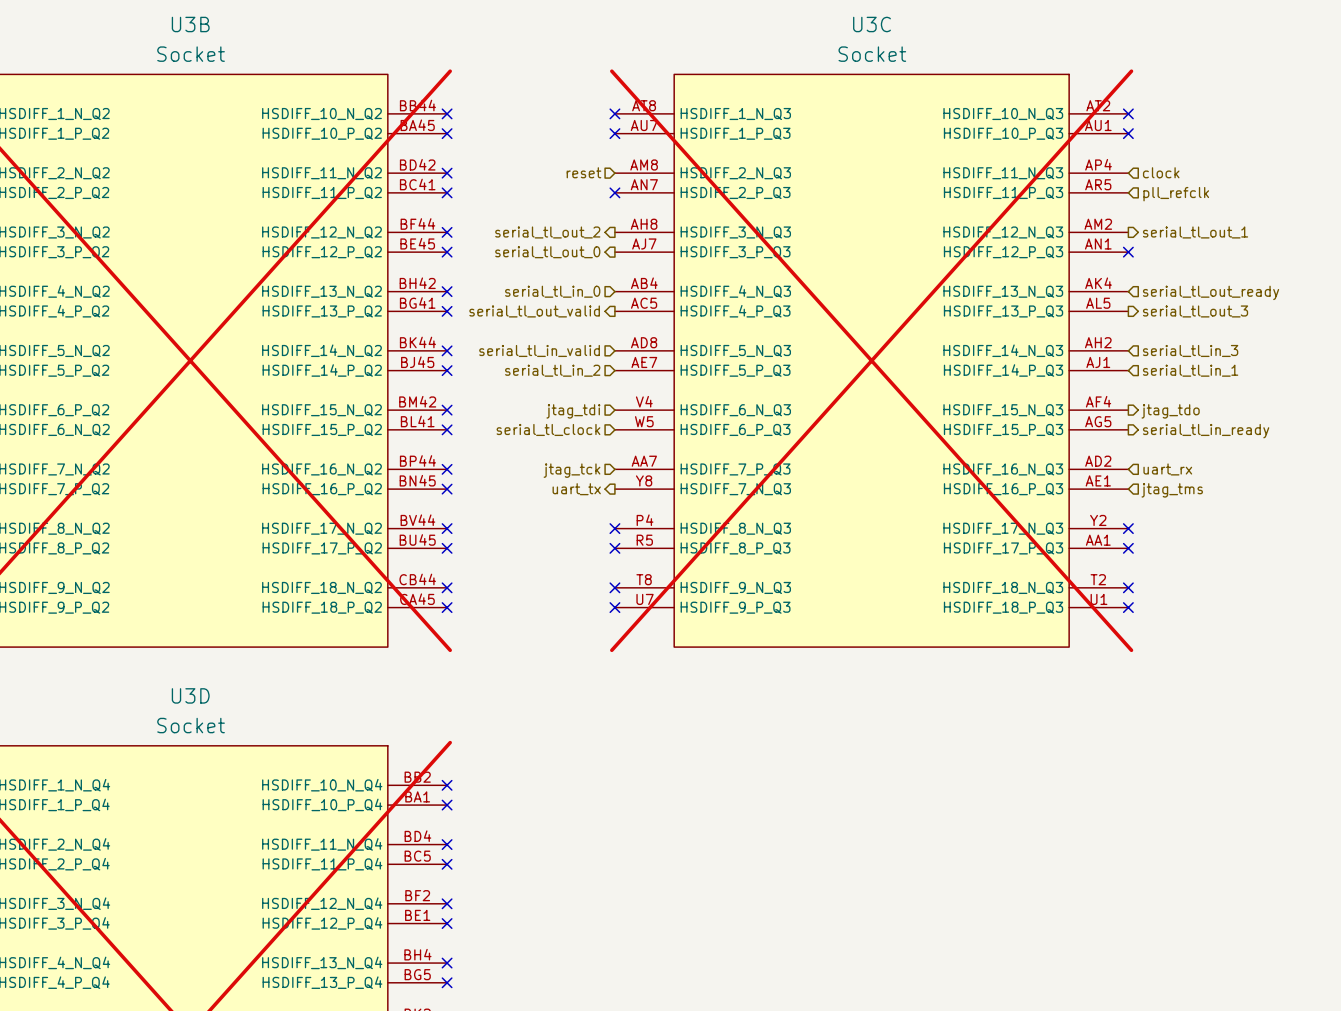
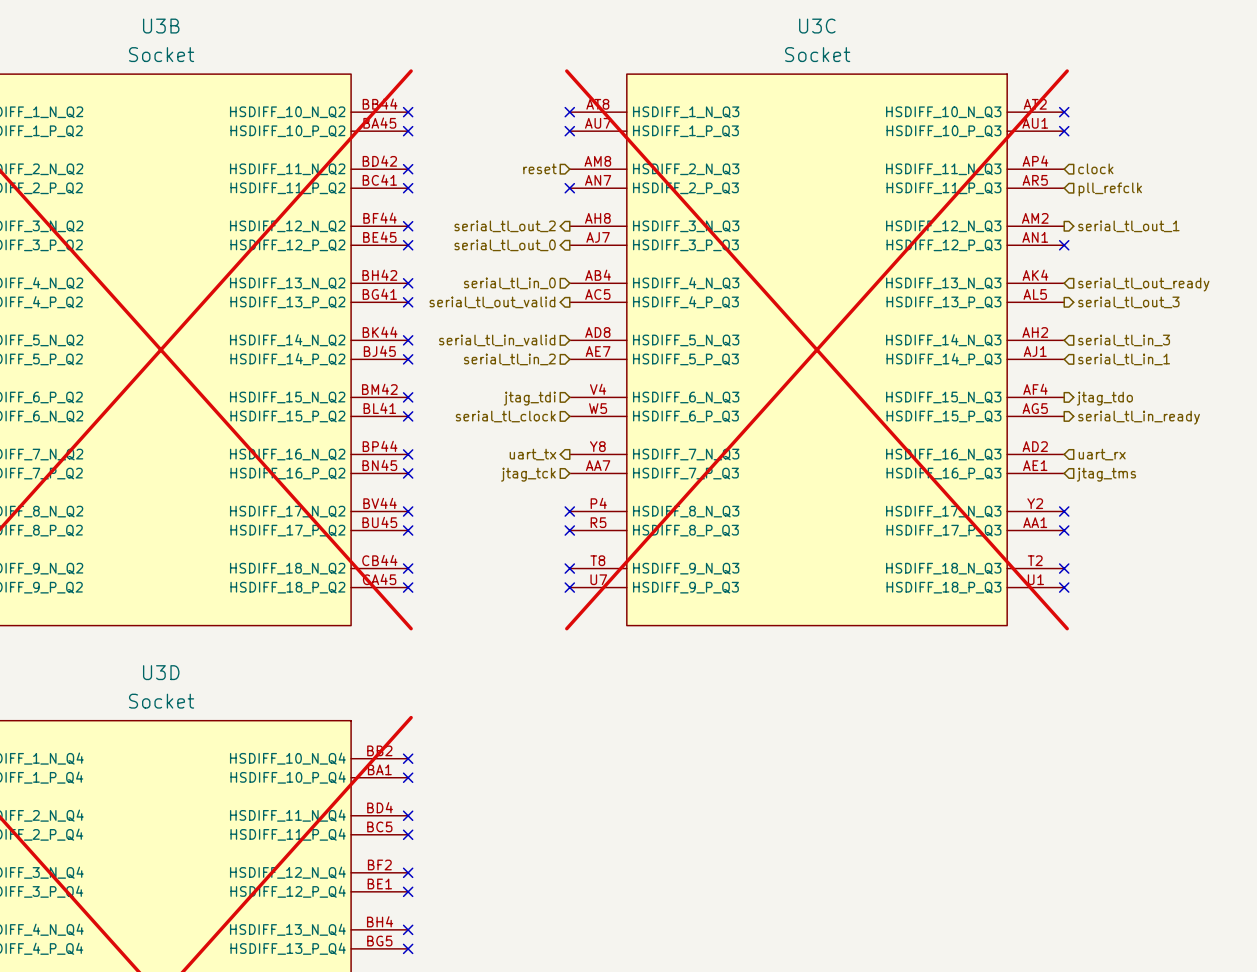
U3C pin number: AA7 (644, 461) -> Y8 (597, 446)
U3C pin name: HSDIFF_7_P_Q3 (735, 469) -> HSDIFF_7_N_Q3 (686, 454)
hierarchical label shape: input (571, 470) -> output (532, 454)
hierarchical label: jtag_tck (571, 470) -> uart_tx (532, 454)
U3C pin number: Y8 (644, 480) -> AA7 (598, 465)
hierarchical label shape: output (576, 489) -> input (528, 474)
hierarchical label: uart_tx (576, 489) -> jtag_tck (528, 474)
U3C pin name: HSDIFF_7_N_Q3 (735, 489) -> HSDIFF_7_P_Q3 (685, 473)

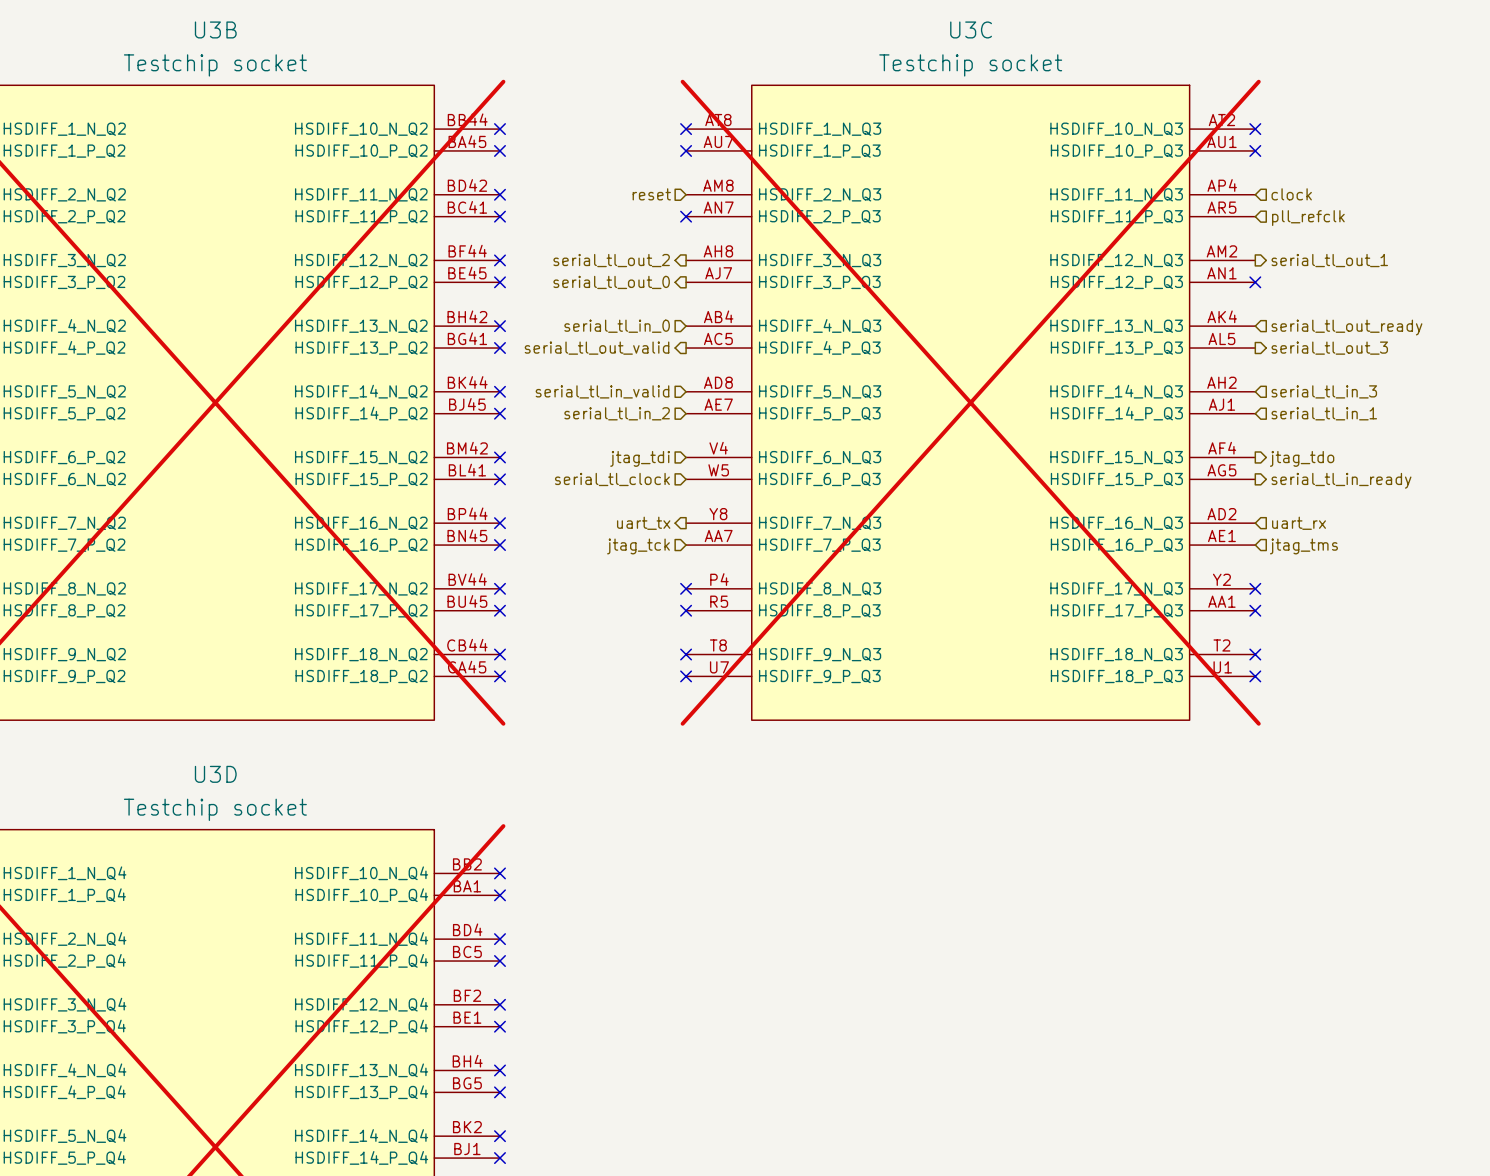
U3B value: Socket (161, 54) -> Testchip socket (215, 65)
U3C value: Socket (817, 54) -> Testchip socket (970, 65)
U3D value: Socket (161, 701) -> Testchip socket (215, 809)

